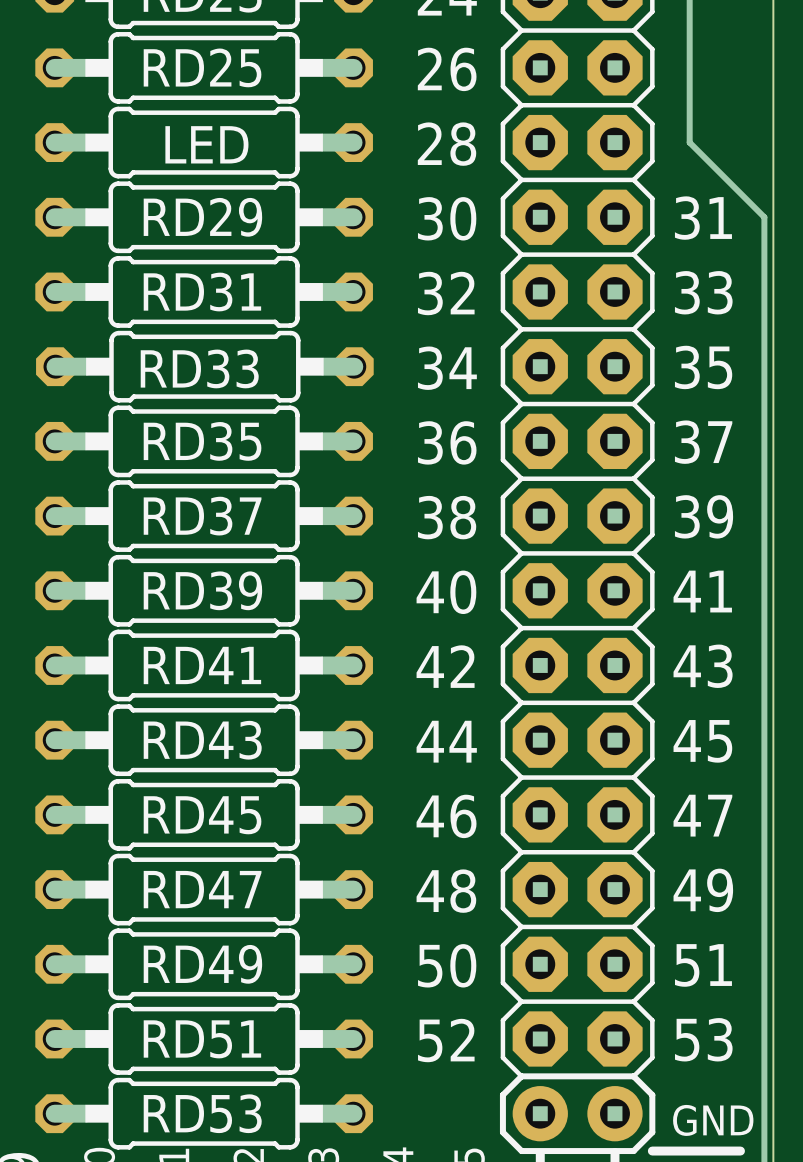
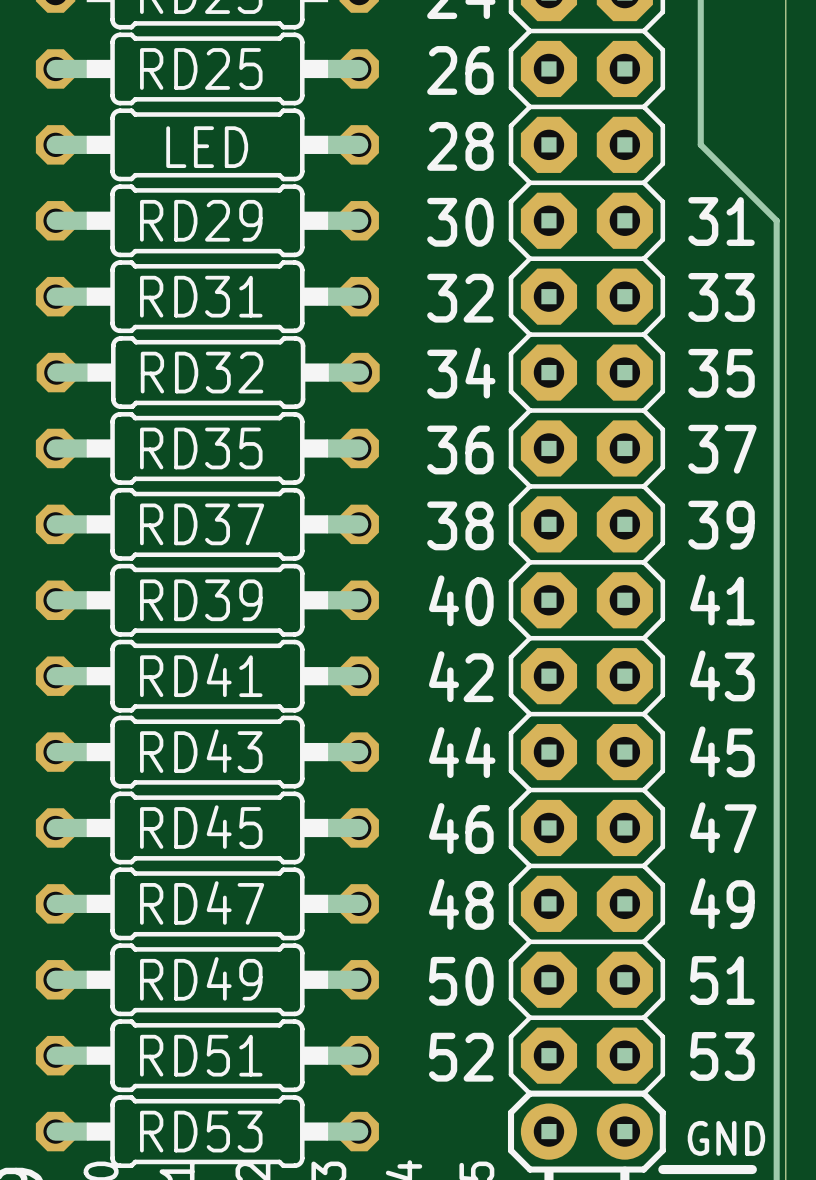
RD33 name: RD33 (199, 368) -> RD32 (202, 372)

